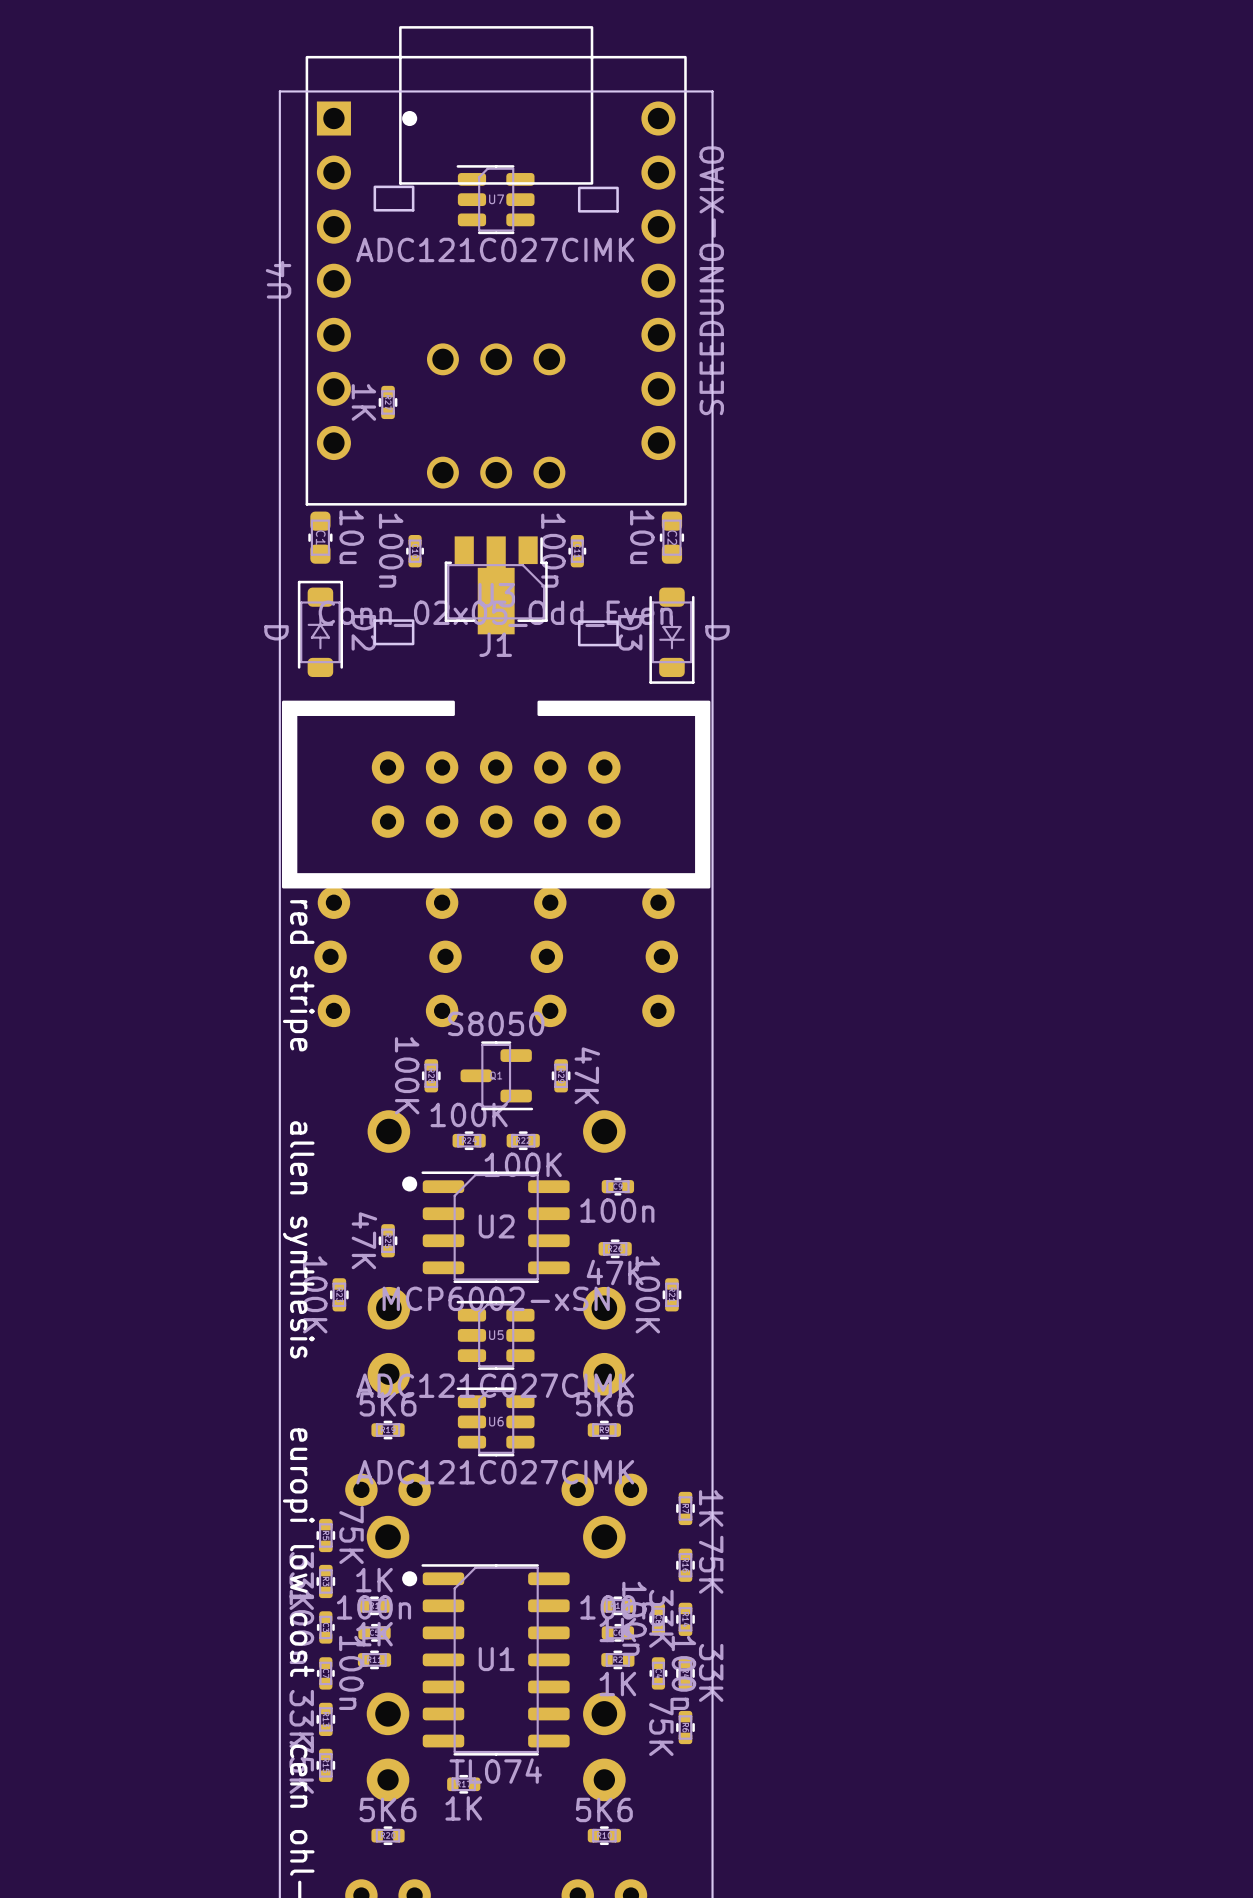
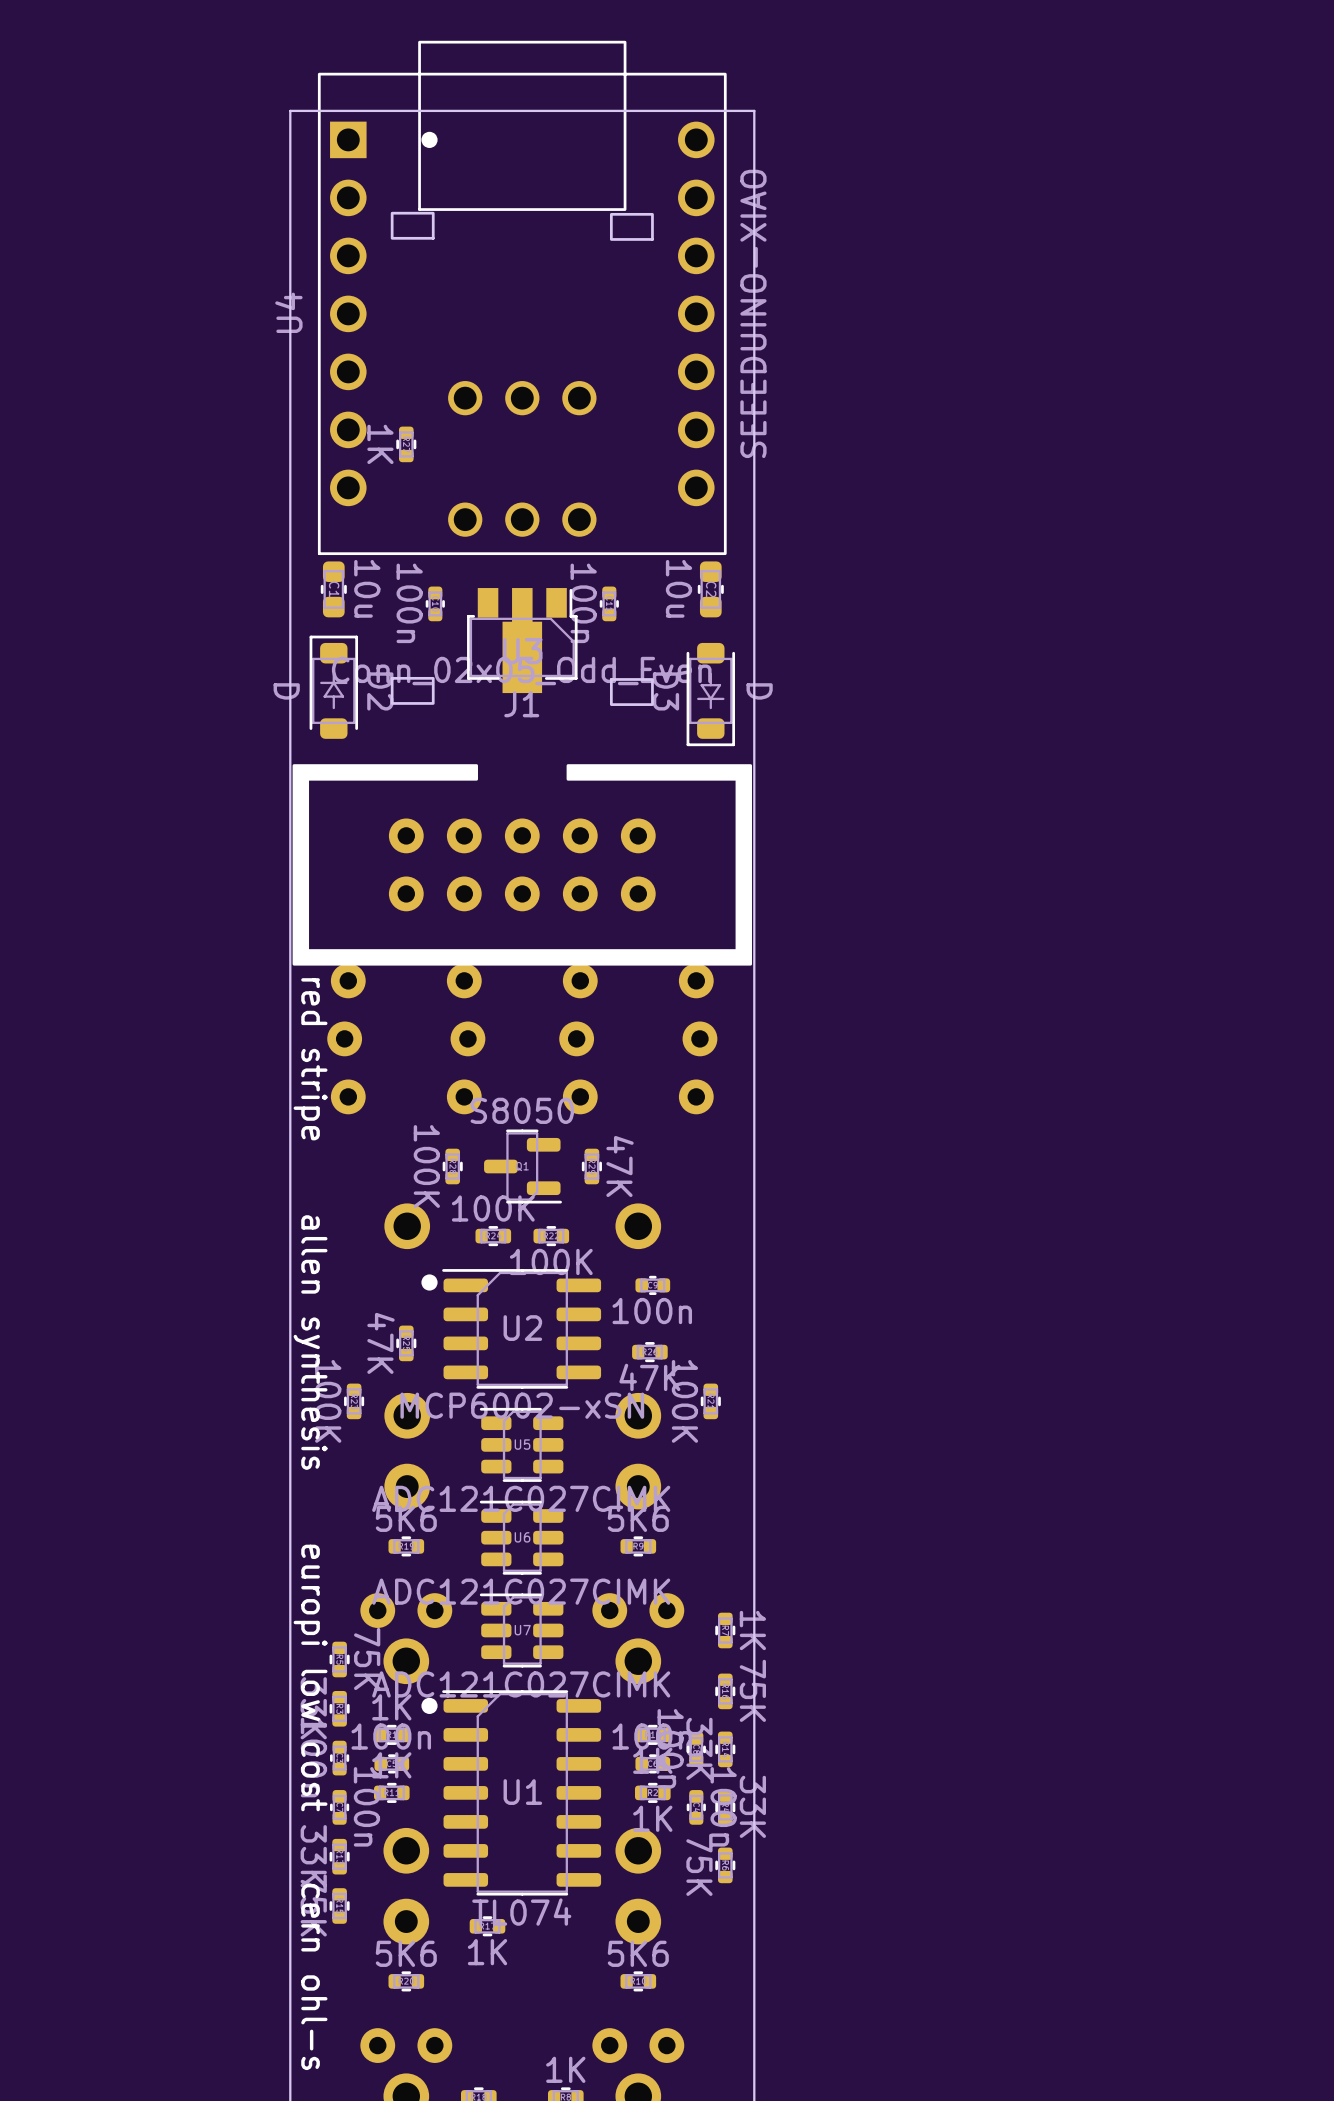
U7 position: (495, 199) -> (521, 1630)

